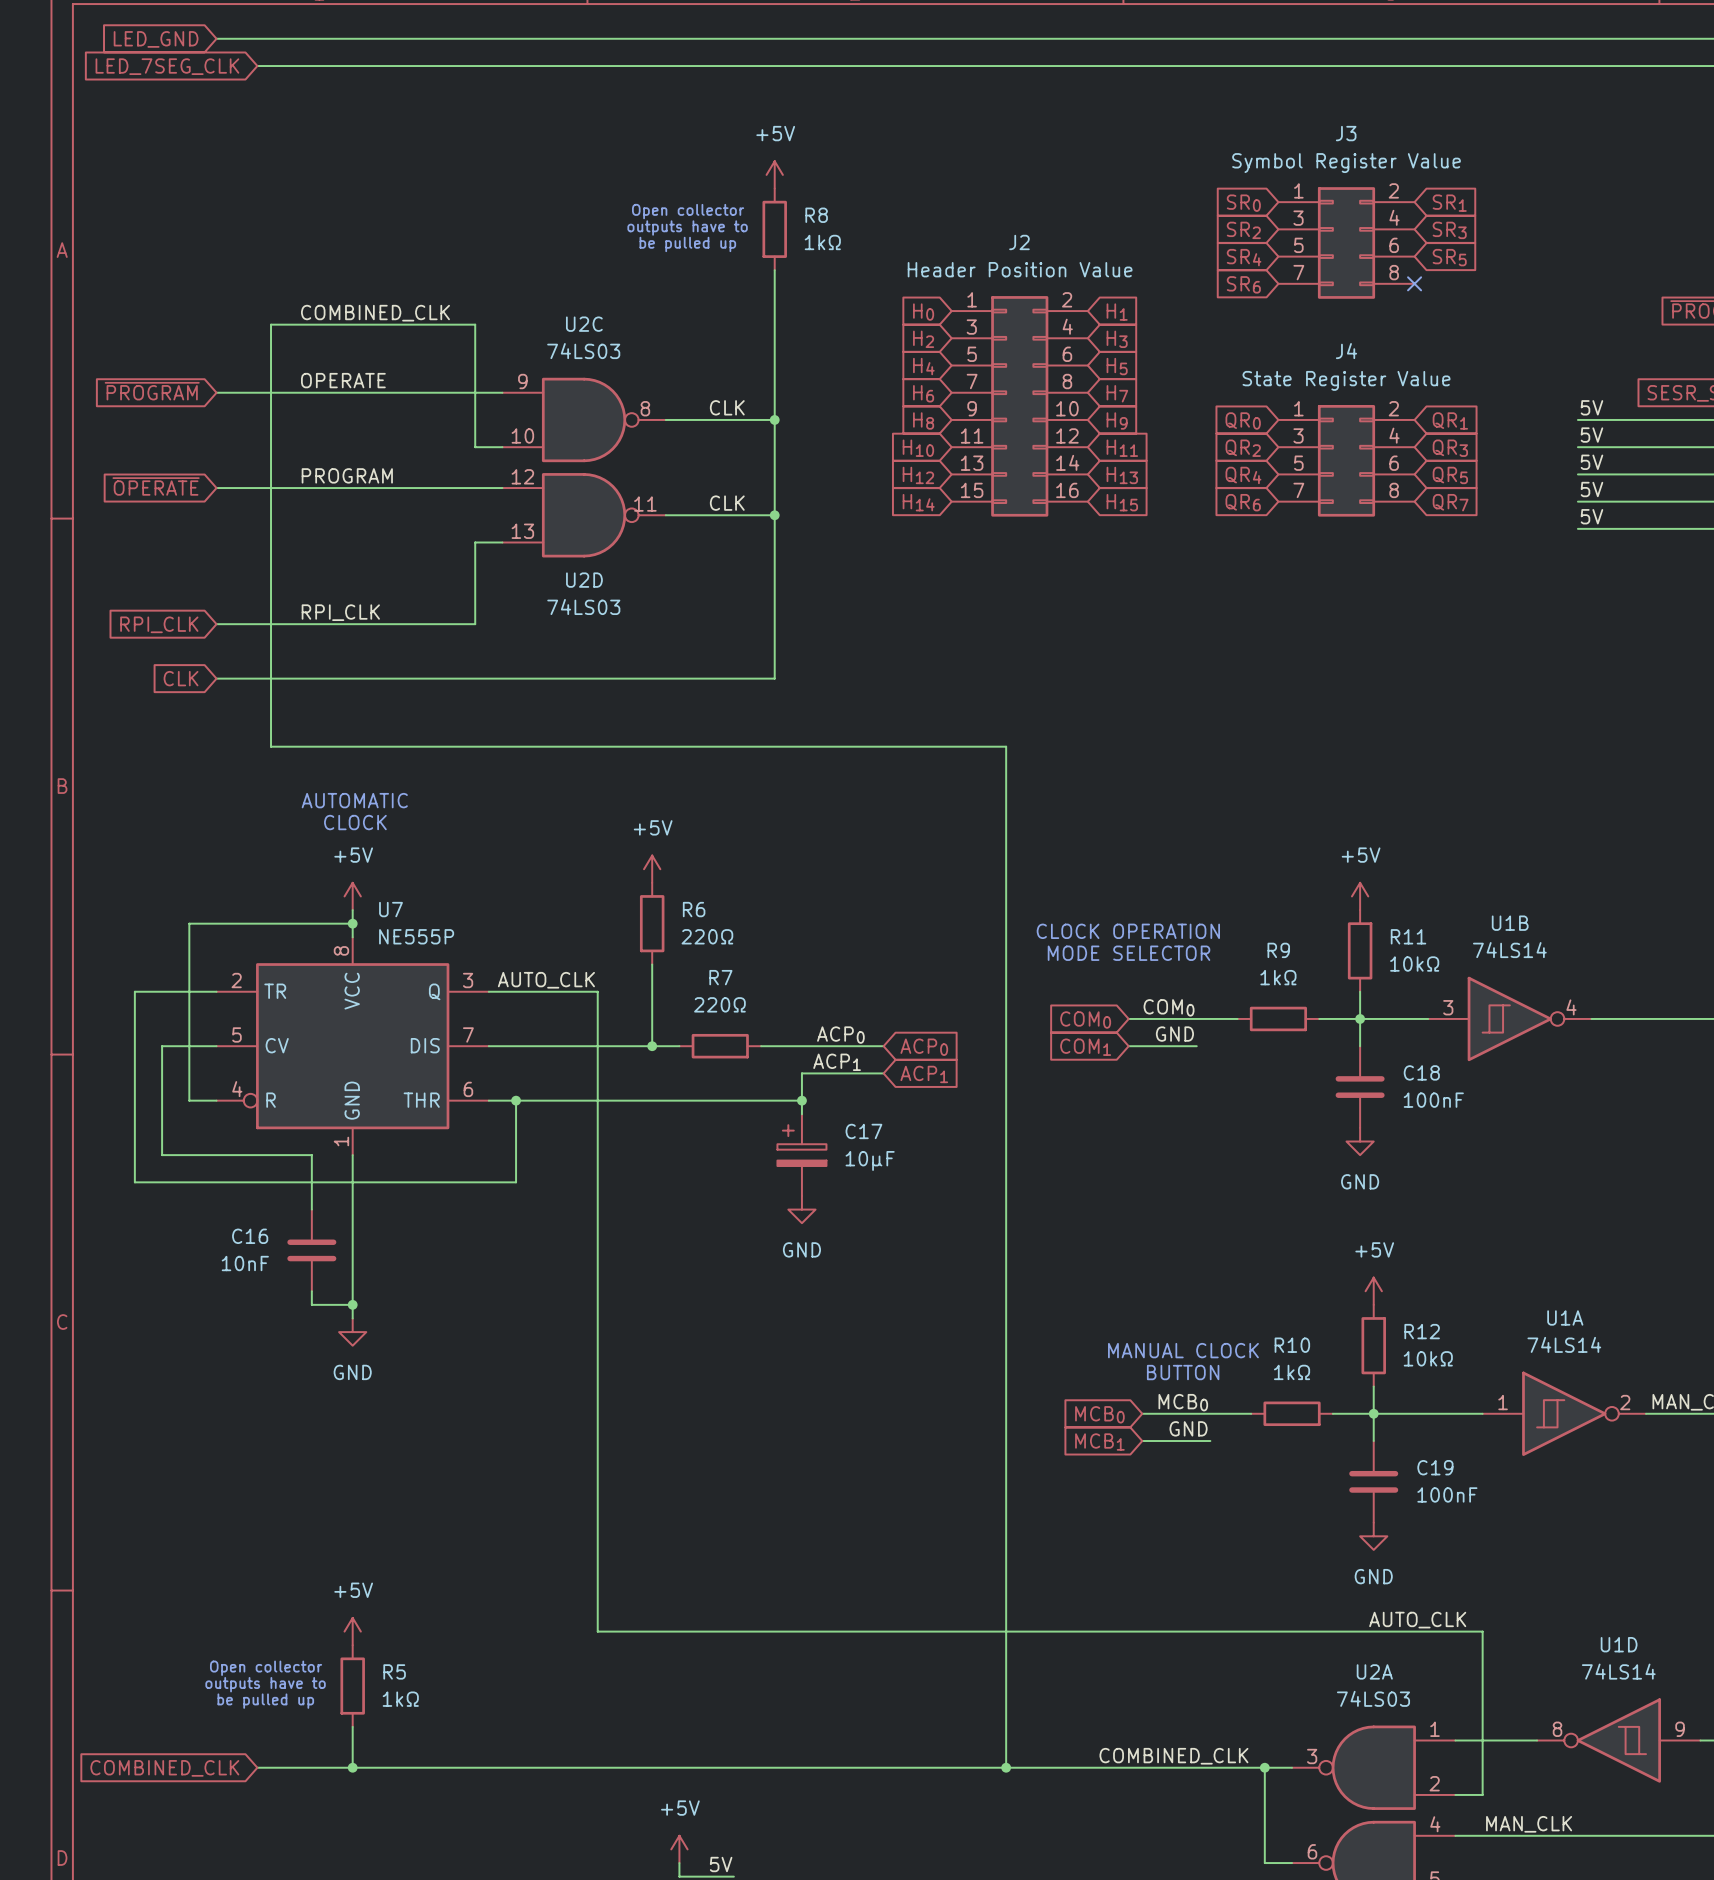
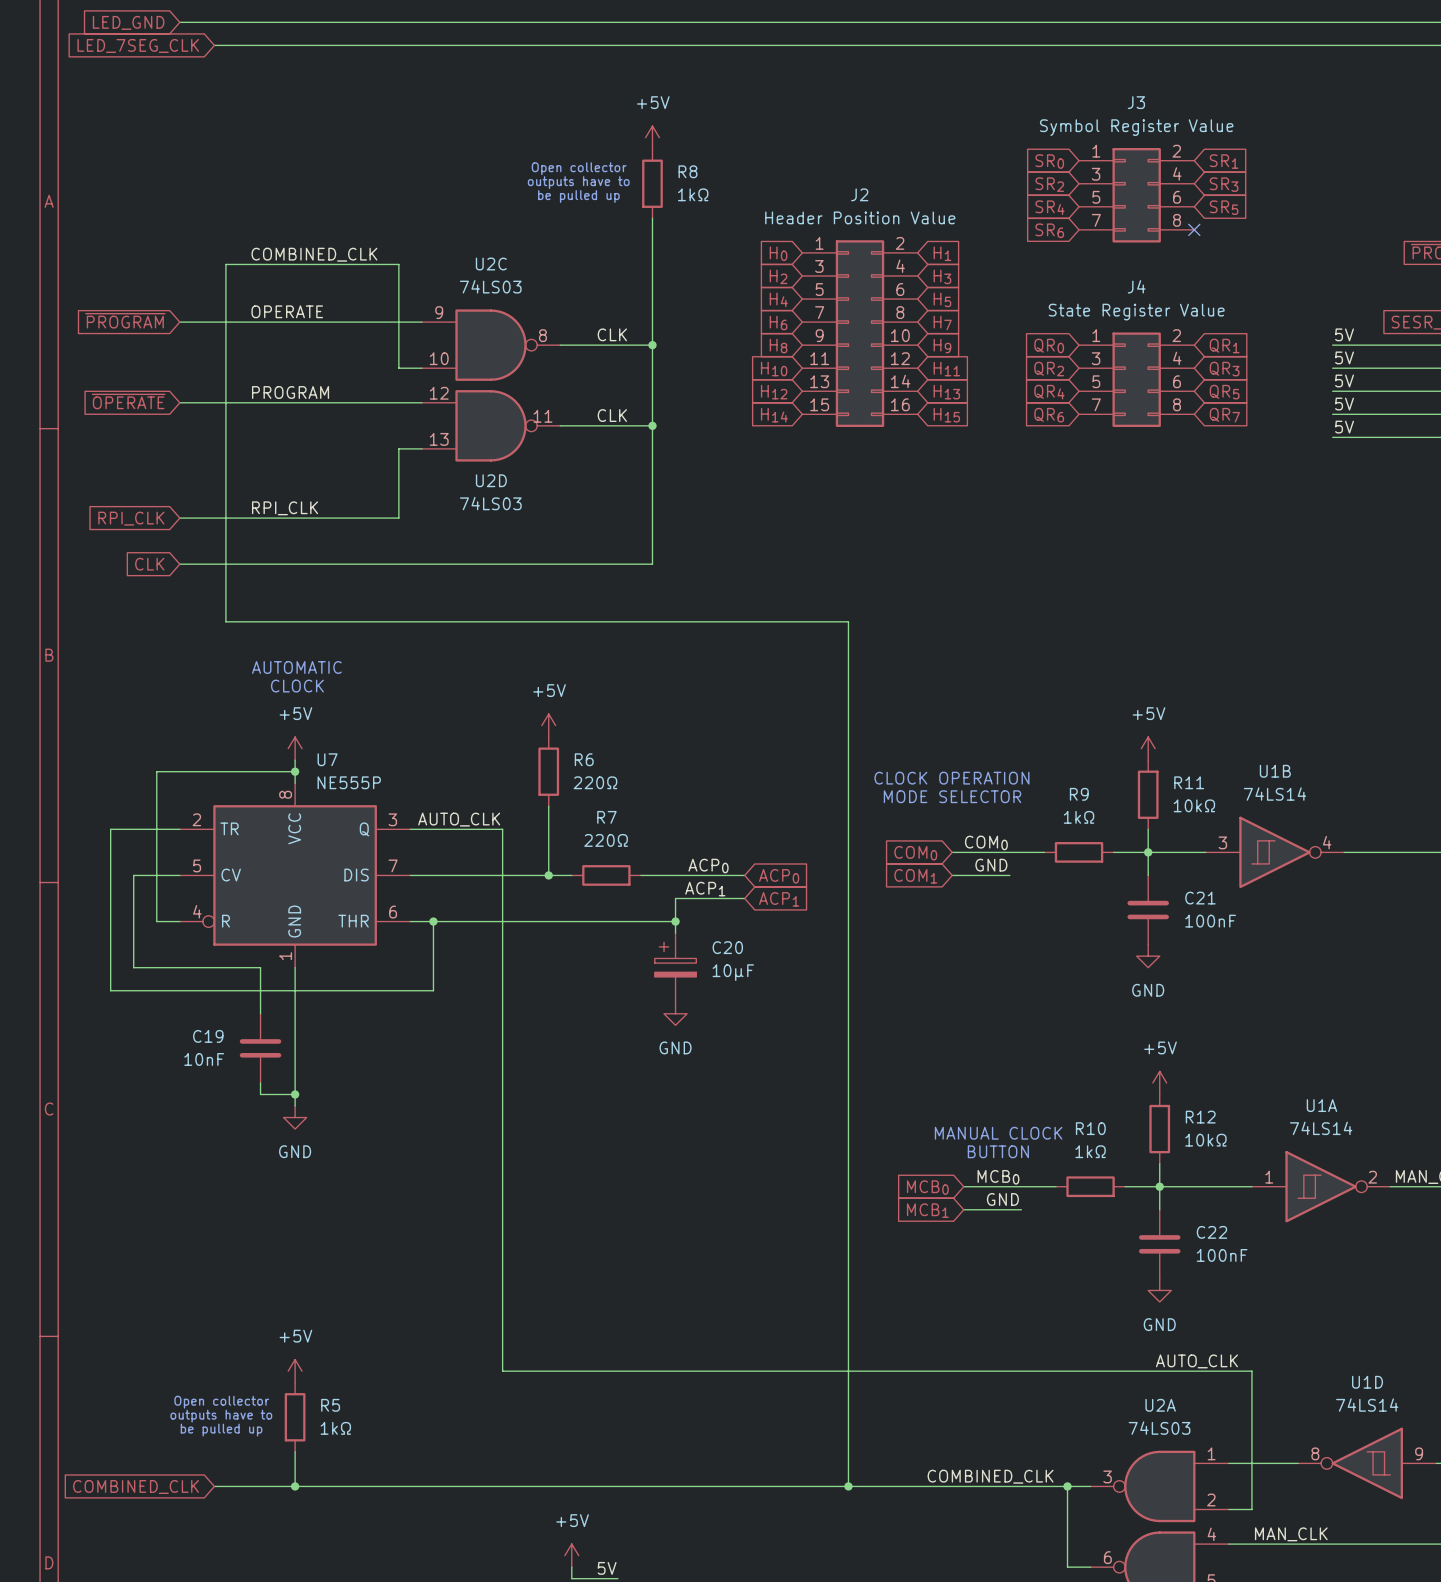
C18 name: C18 (1421, 1072) -> C21 (1200, 898)
C17 name: C17 (863, 1131) -> C20 (727, 947)
C16 name: C16 (250, 1236) -> C19 (208, 1036)
C19 name: C19 (1435, 1467) -> C22 (1211, 1232)

